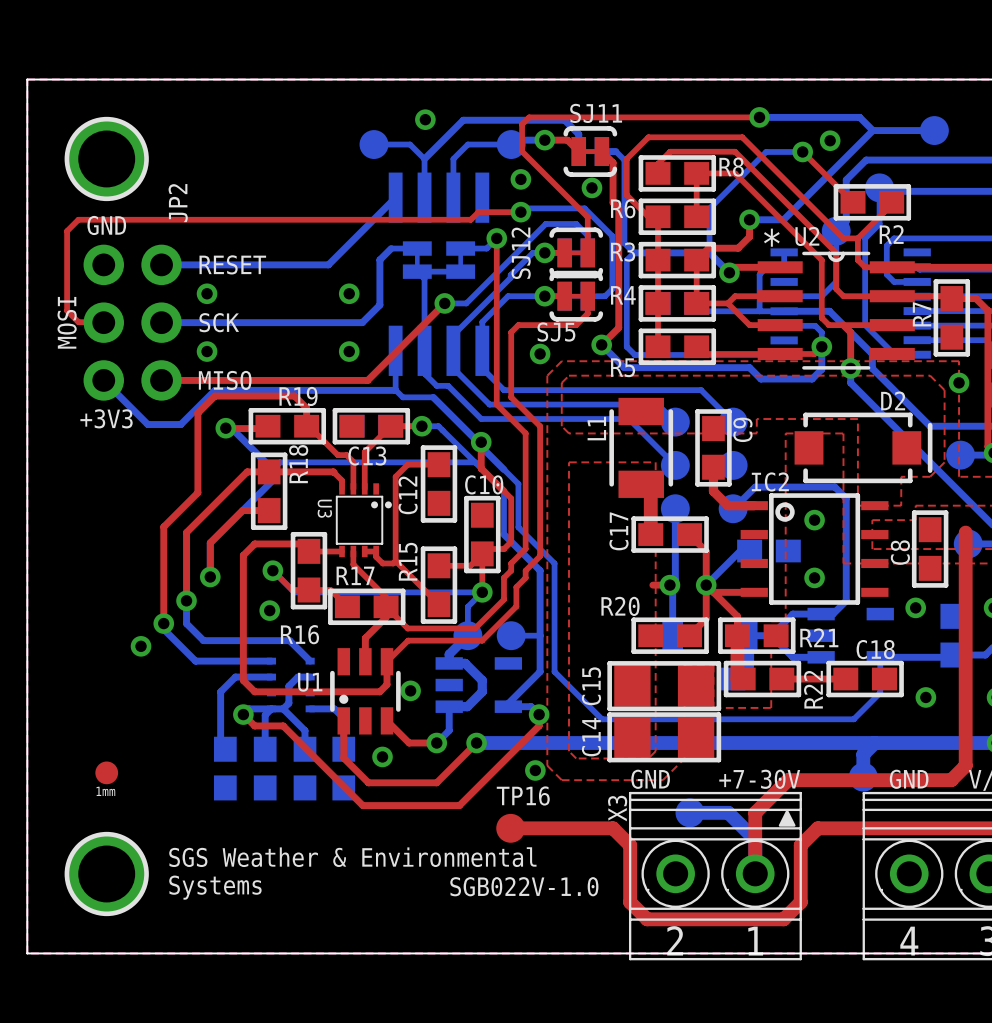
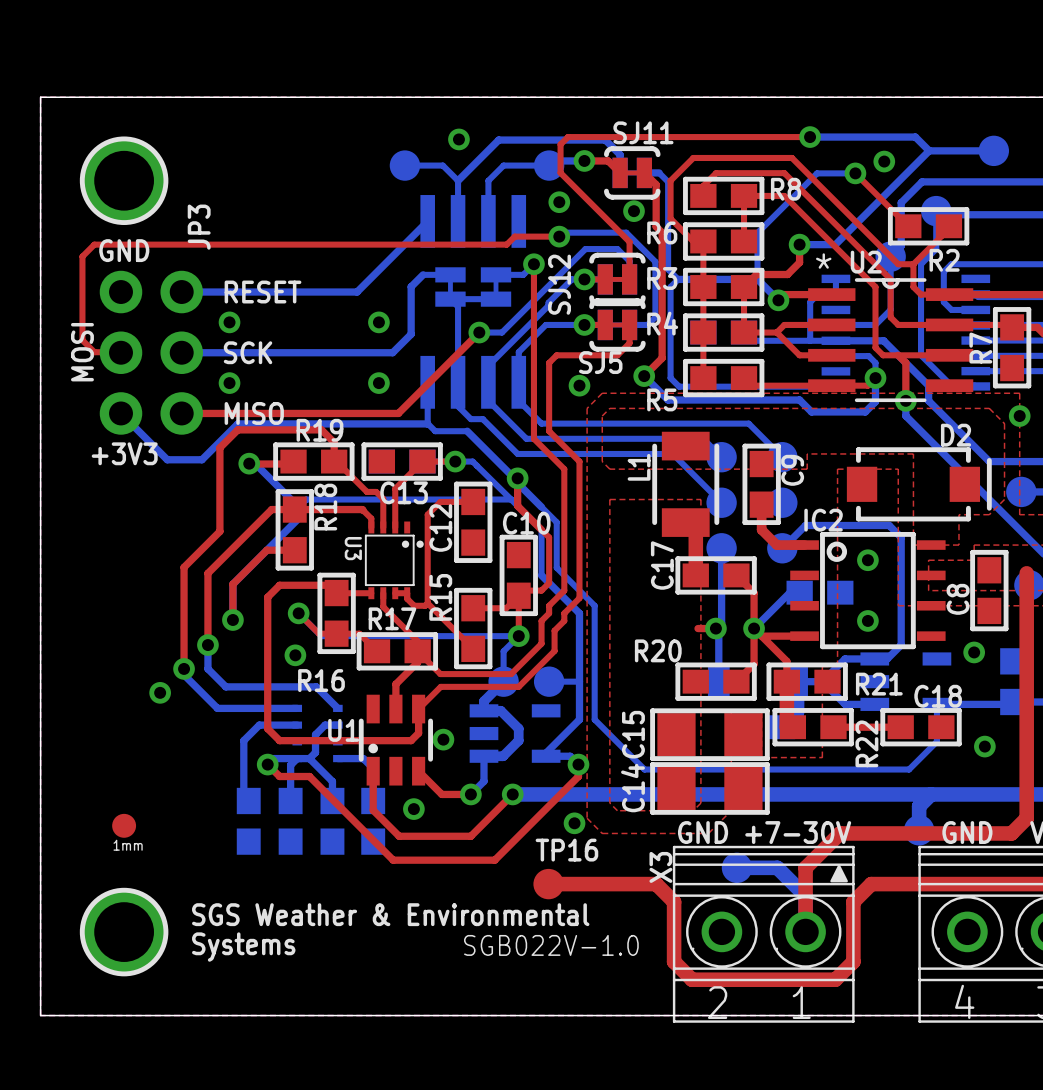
JP2 name: JP2 (178, 203) -> JP3 (199, 227)

